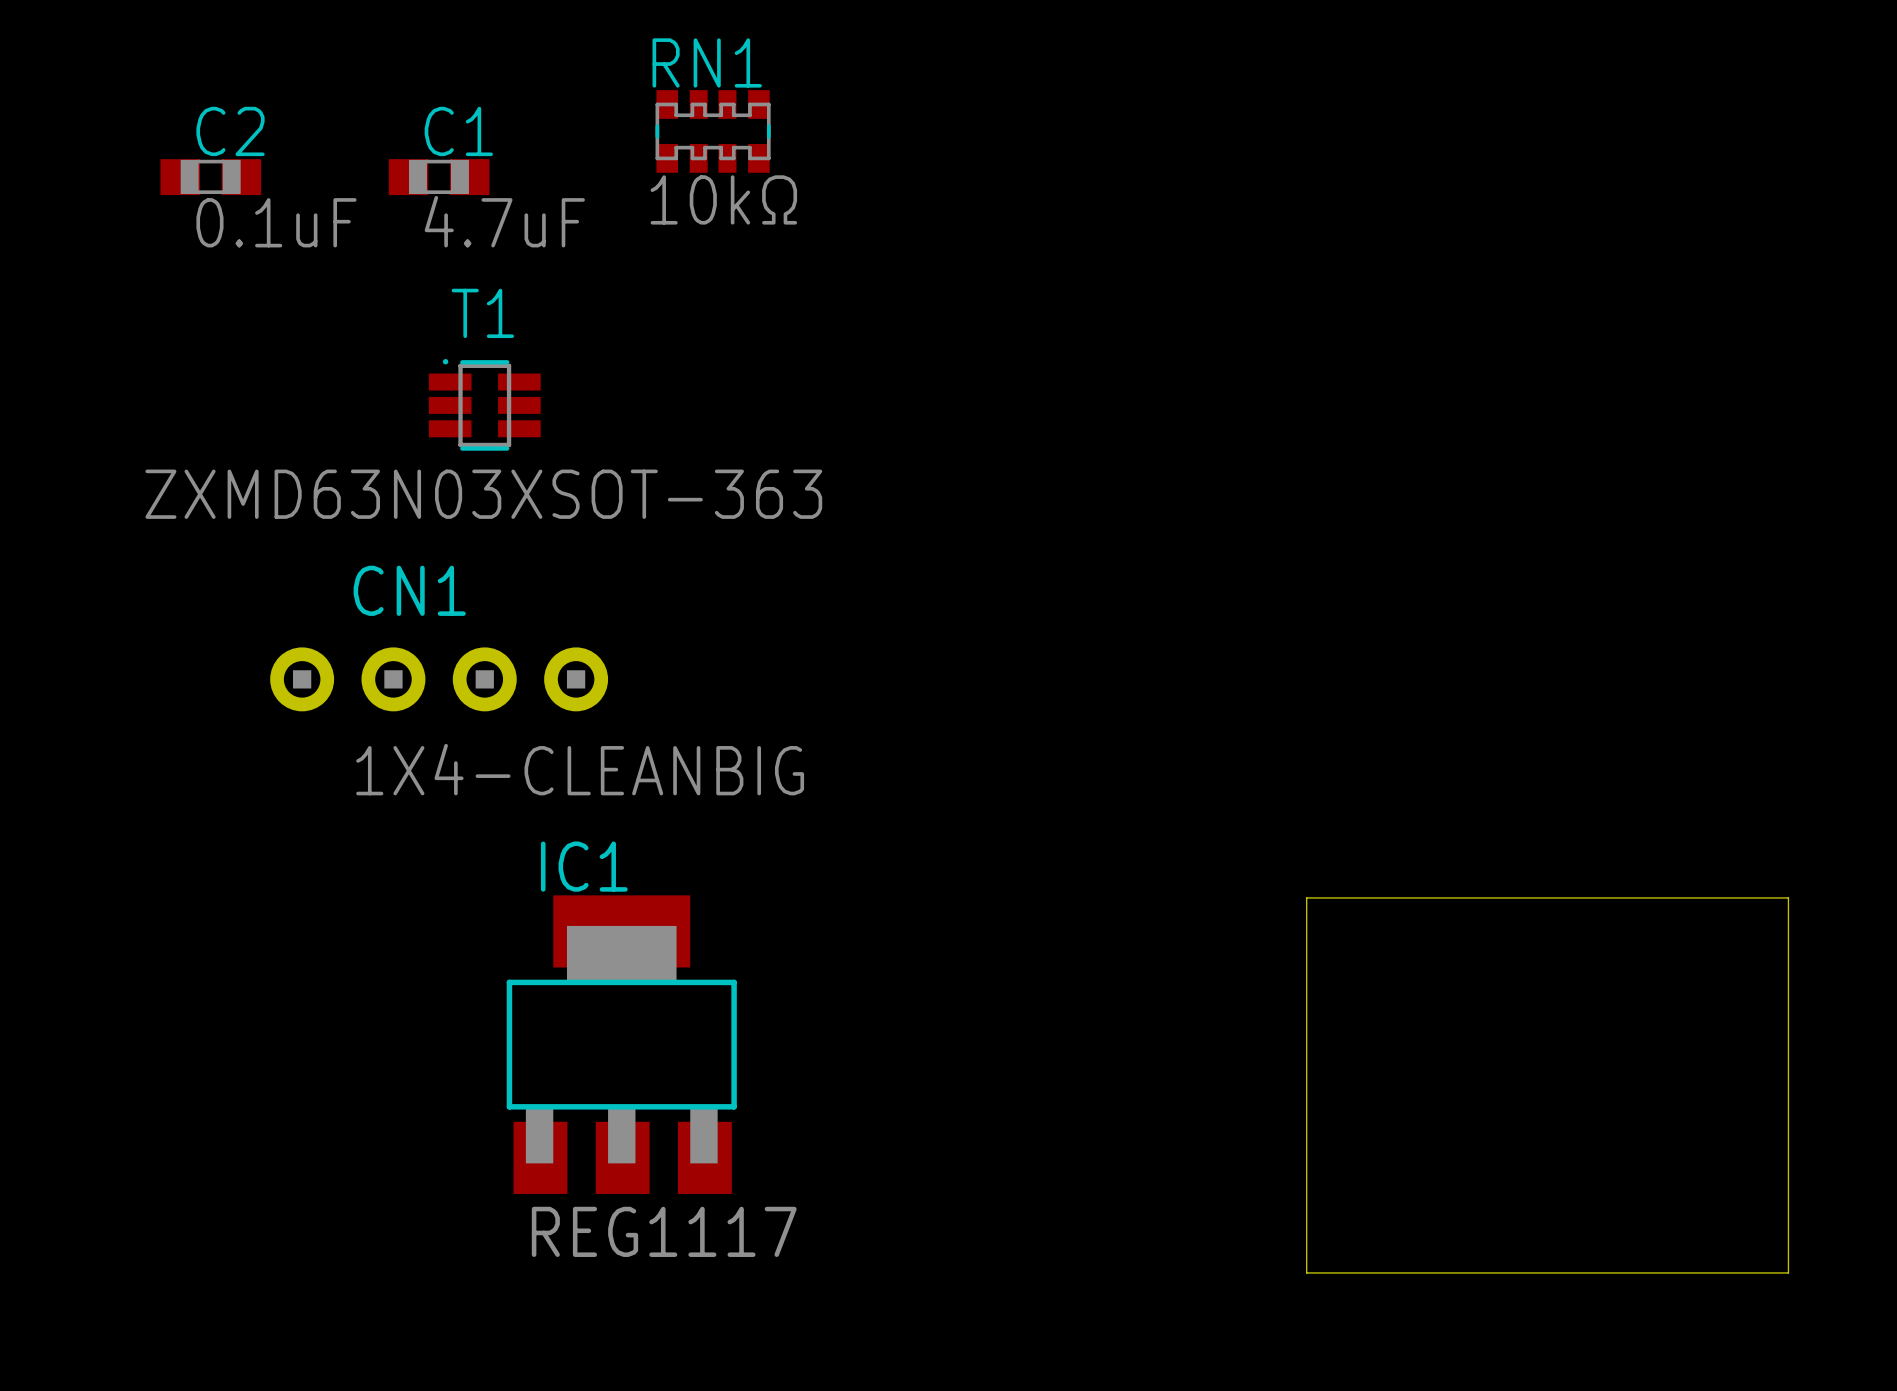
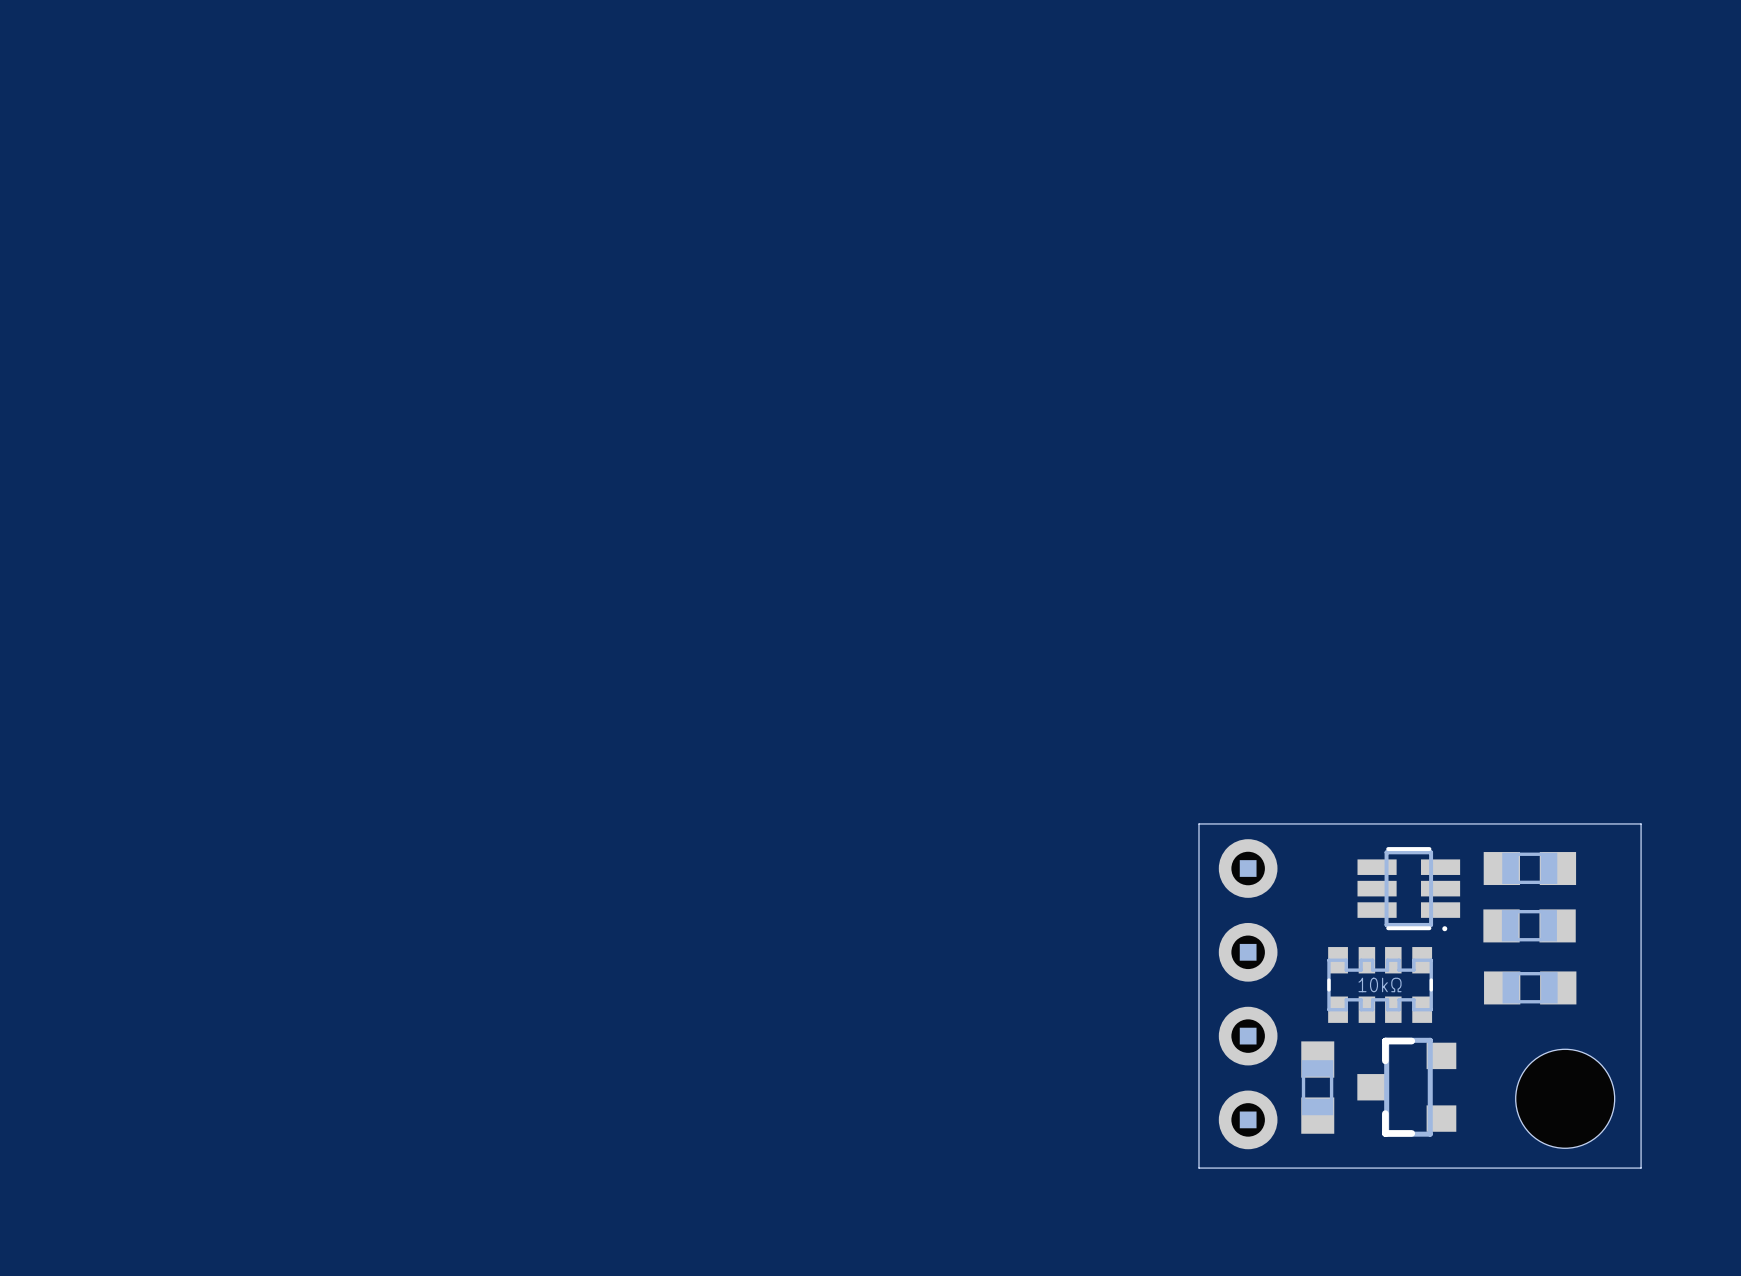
RN1: 10kΩ (713, 131) -> none
C2: 0.1uF (210, 177) -> none
C1: 4.7uF (439, 177) -> none
T1: ZXMD63N03XSOT-363 (484, 404) -> none
CN1: 1X4-CLEANBIG (439, 679) -> none
part: none -> (1529, 868)
part: none -> (1408, 889)
part: none -> (1529, 925)
IC1: REG1117 (621, 1044) -> none
part: none -> 10kΩ (1380, 984)
part: none -> (1530, 987)
part: none -> (1248, 994)
part: none -> (1406, 1087)
part: none -> (1317, 1087)
hole: none -> (1565, 1098)

